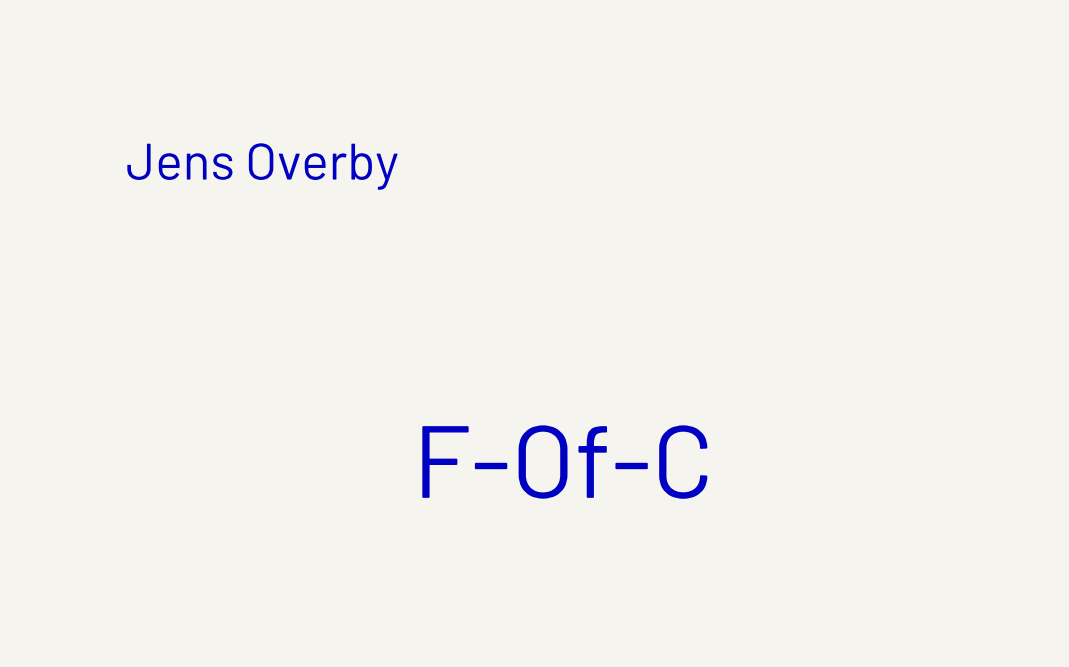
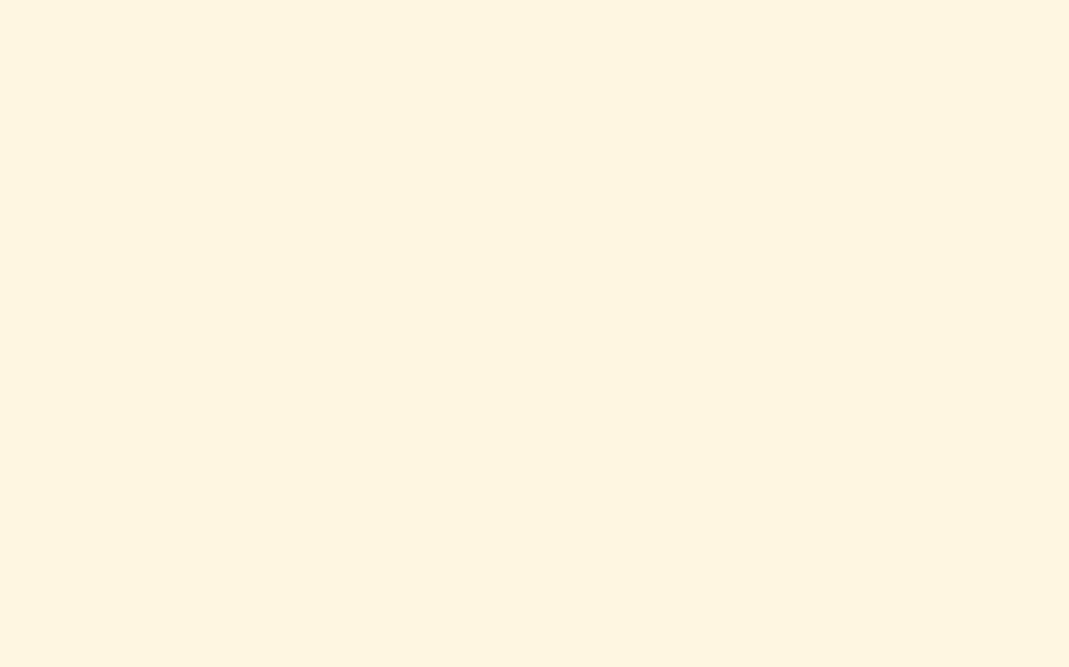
text: Jens Overby (262, 166) -> none
text: F-Of-C (564, 462) -> none

